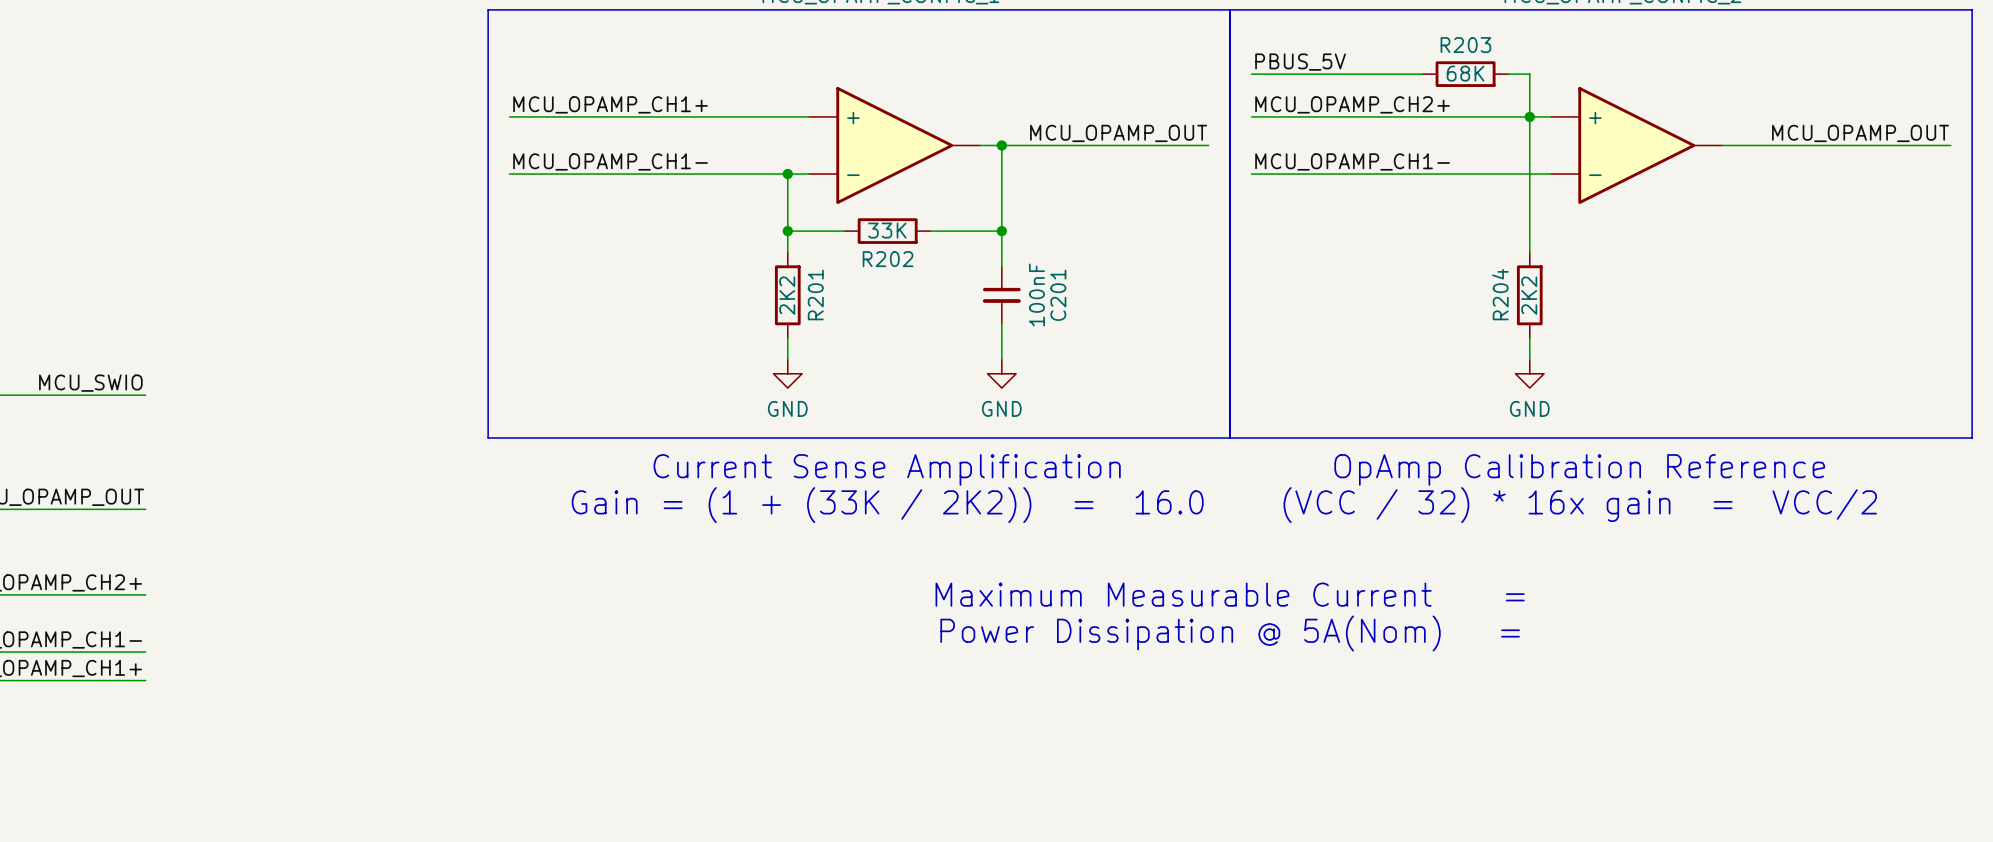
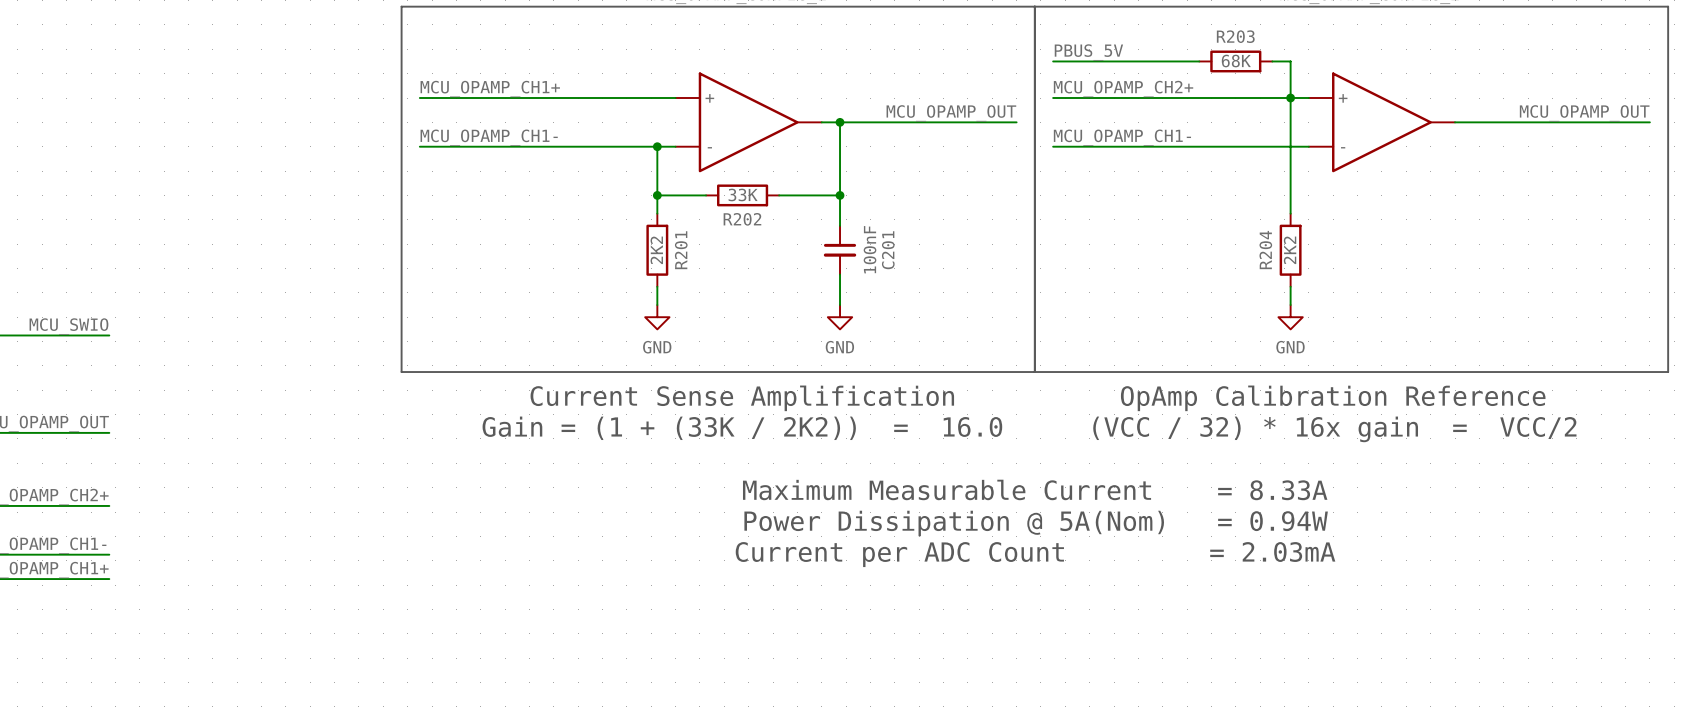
text: Maximum Measurable Current = (1230, 594) -> Maximum Measurable Current = 8.33A (1035, 489)
text: Power Dissipation @ 5A(Nom) = (1230, 633) -> Power Dissipation @ 5A(Nom) = 0.94W (1036, 523)
text: none -> Current per ADC Count = 2.03mA (1035, 554)

